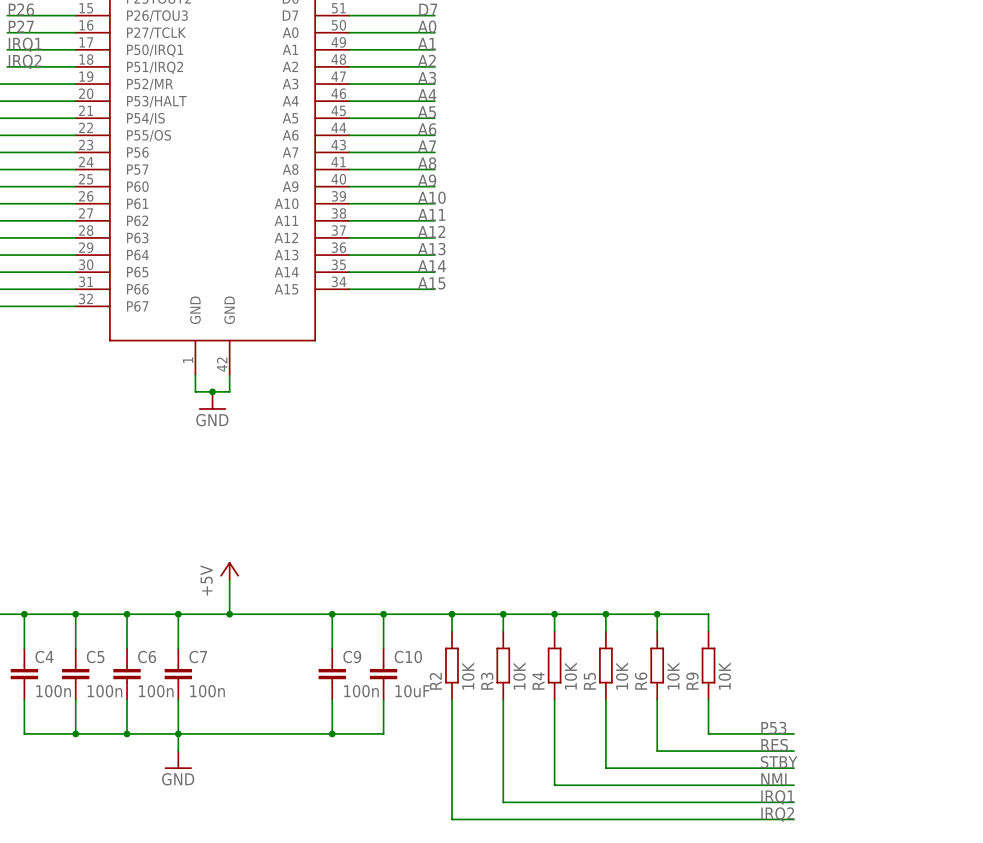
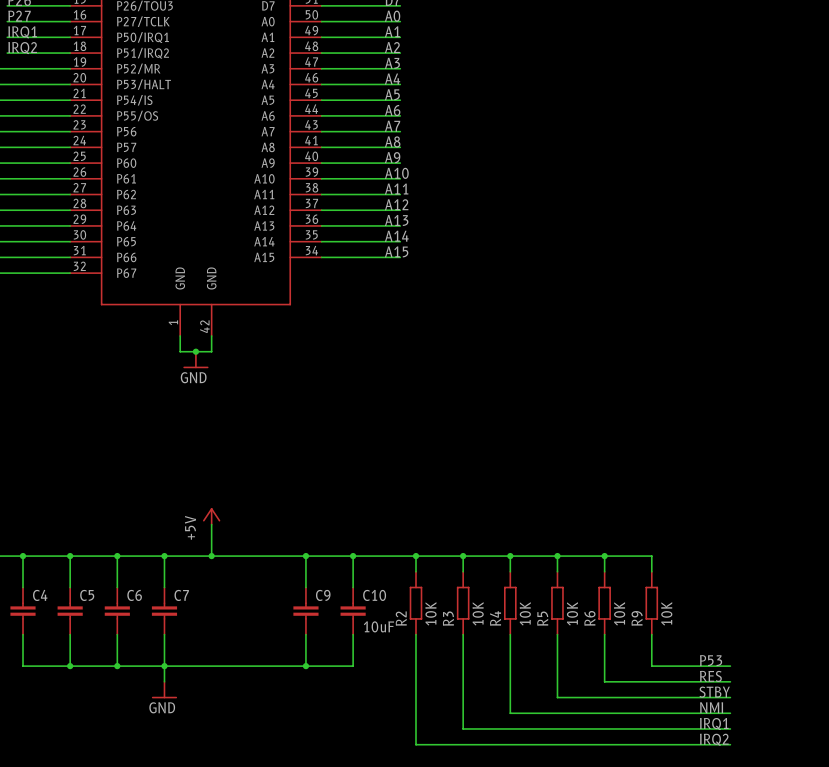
C4 value: 100n (53, 691) -> none
C5 value: 100n (104, 691) -> none
C6 value: 100n (156, 691) -> none
C7 value: 100n (207, 691) -> none
C9 value: 100n (361, 691) -> none

